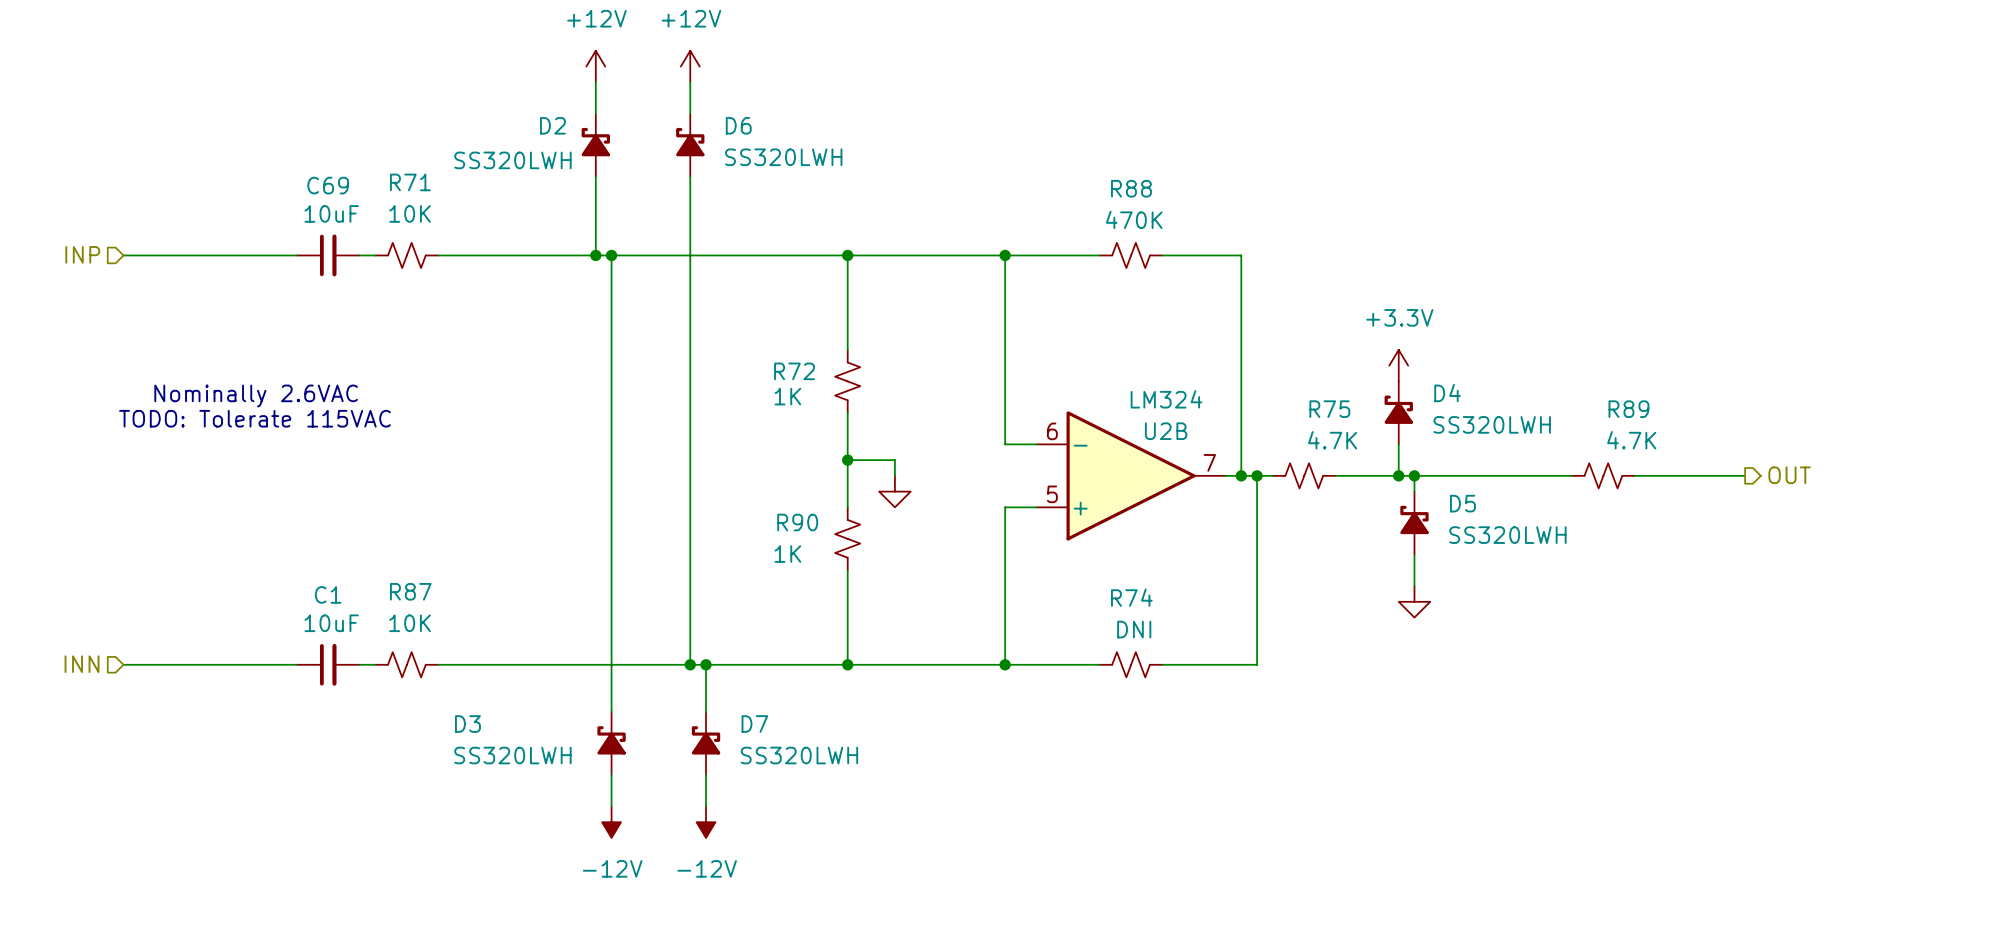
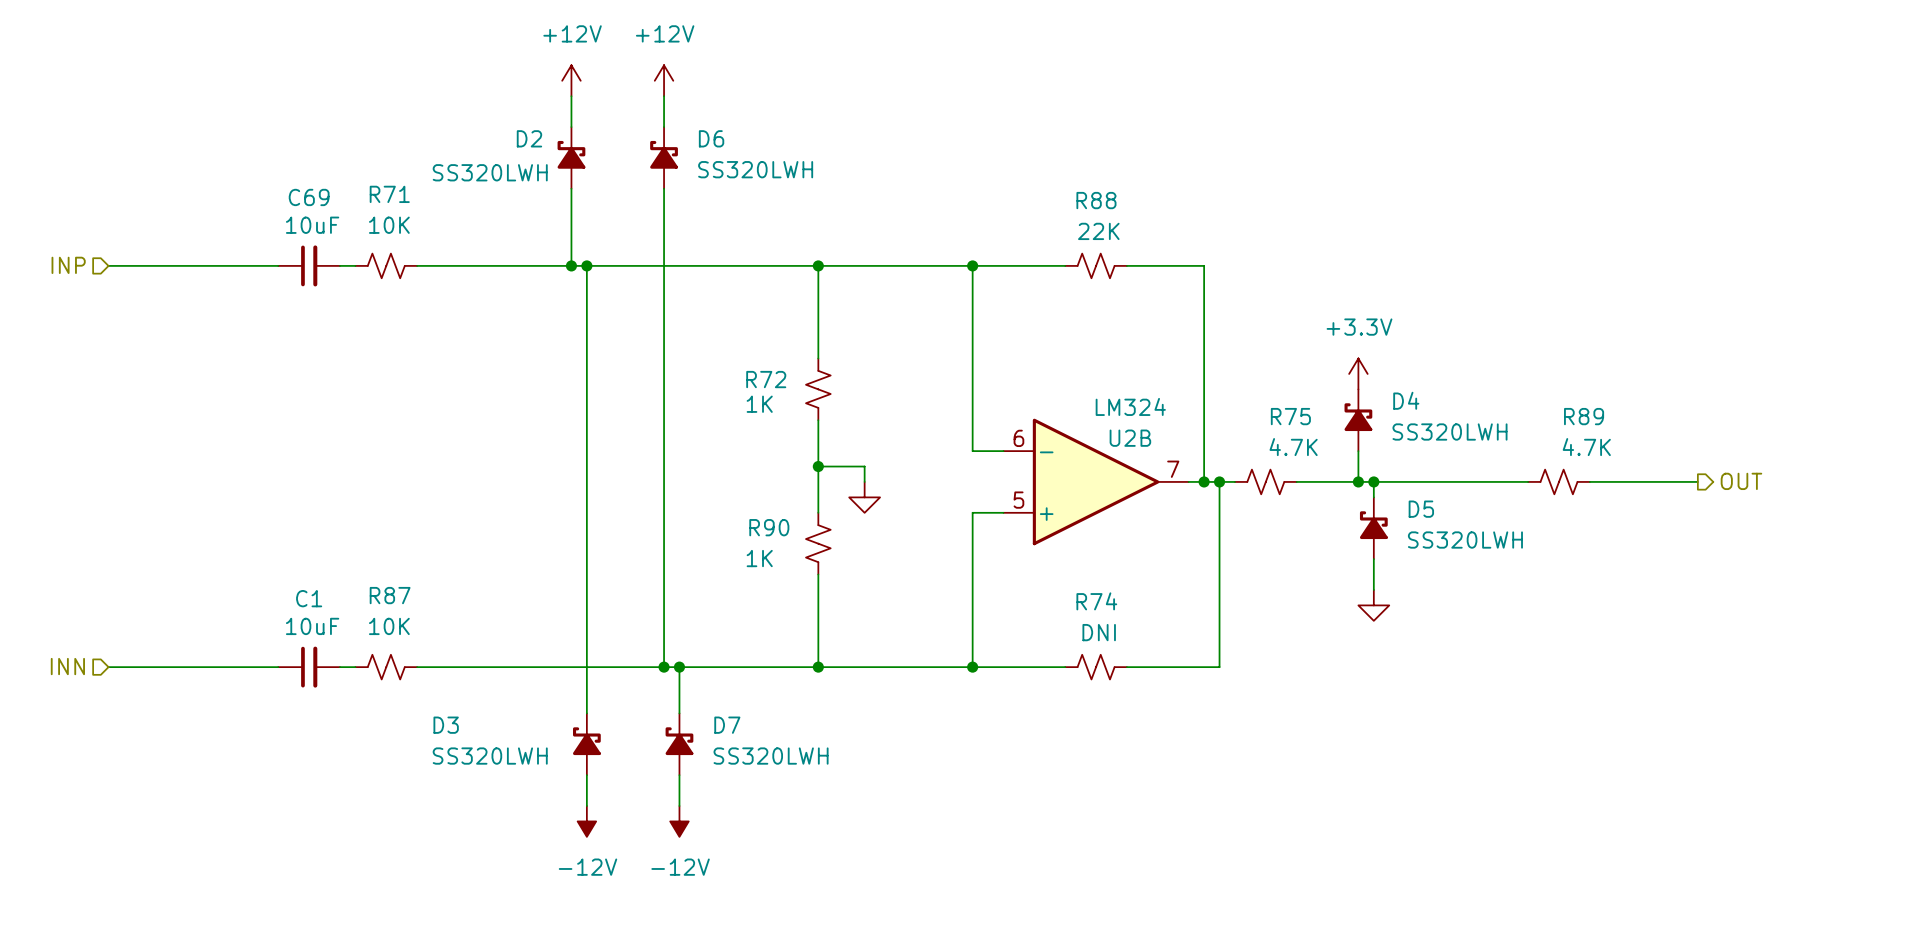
R88 value: 470K (1134, 219) -> 22K (1098, 231)
text: Nominally 2.6VAC (256, 396) -> none
text: TODO: Tolerate 115VAC (255, 418) -> none

